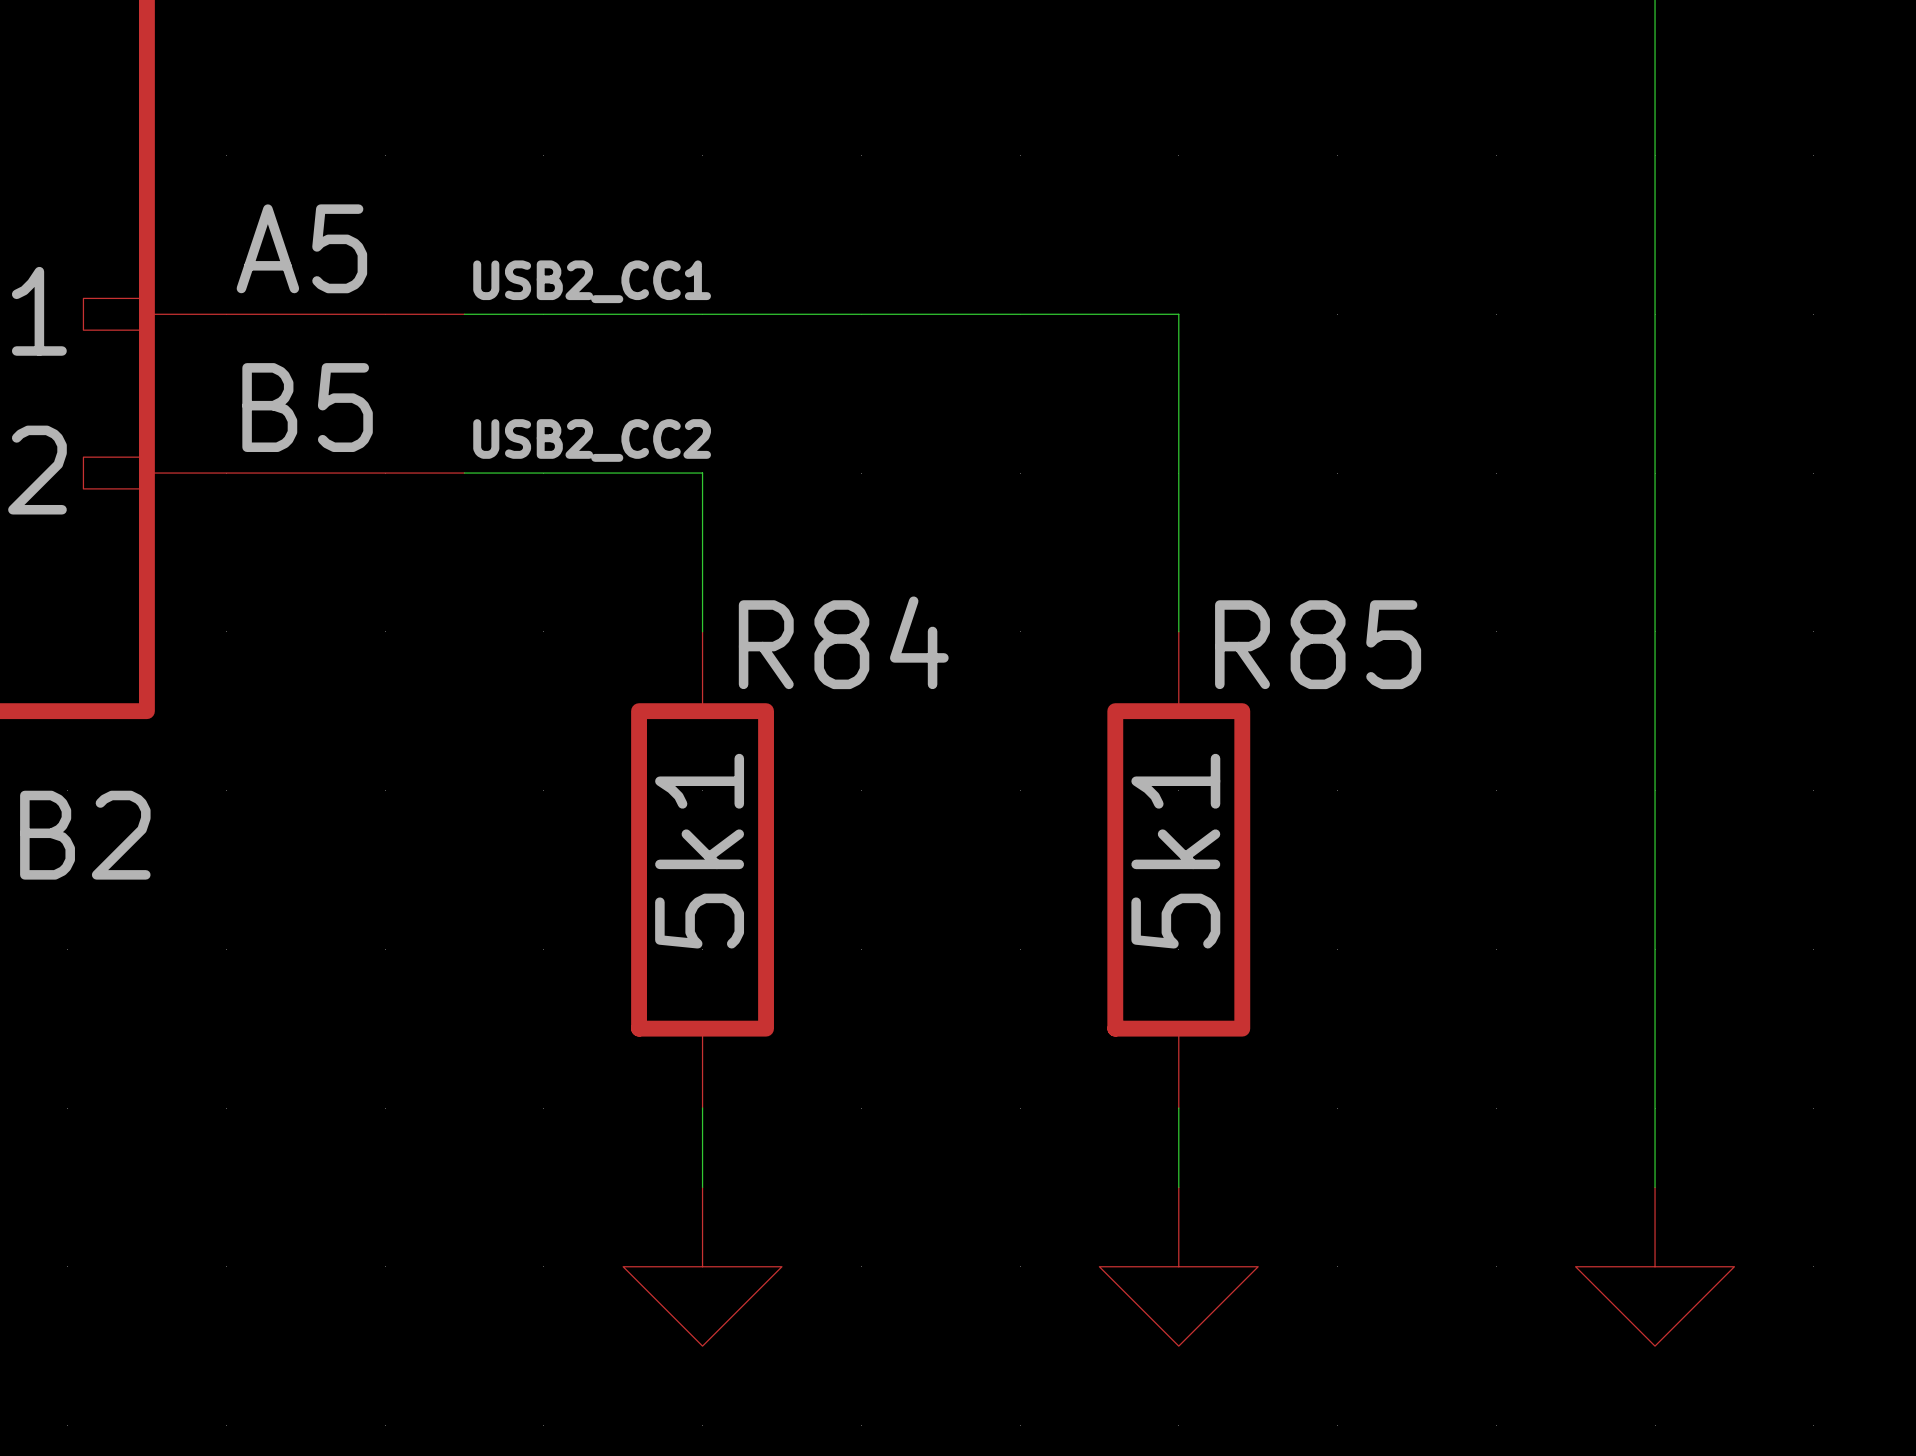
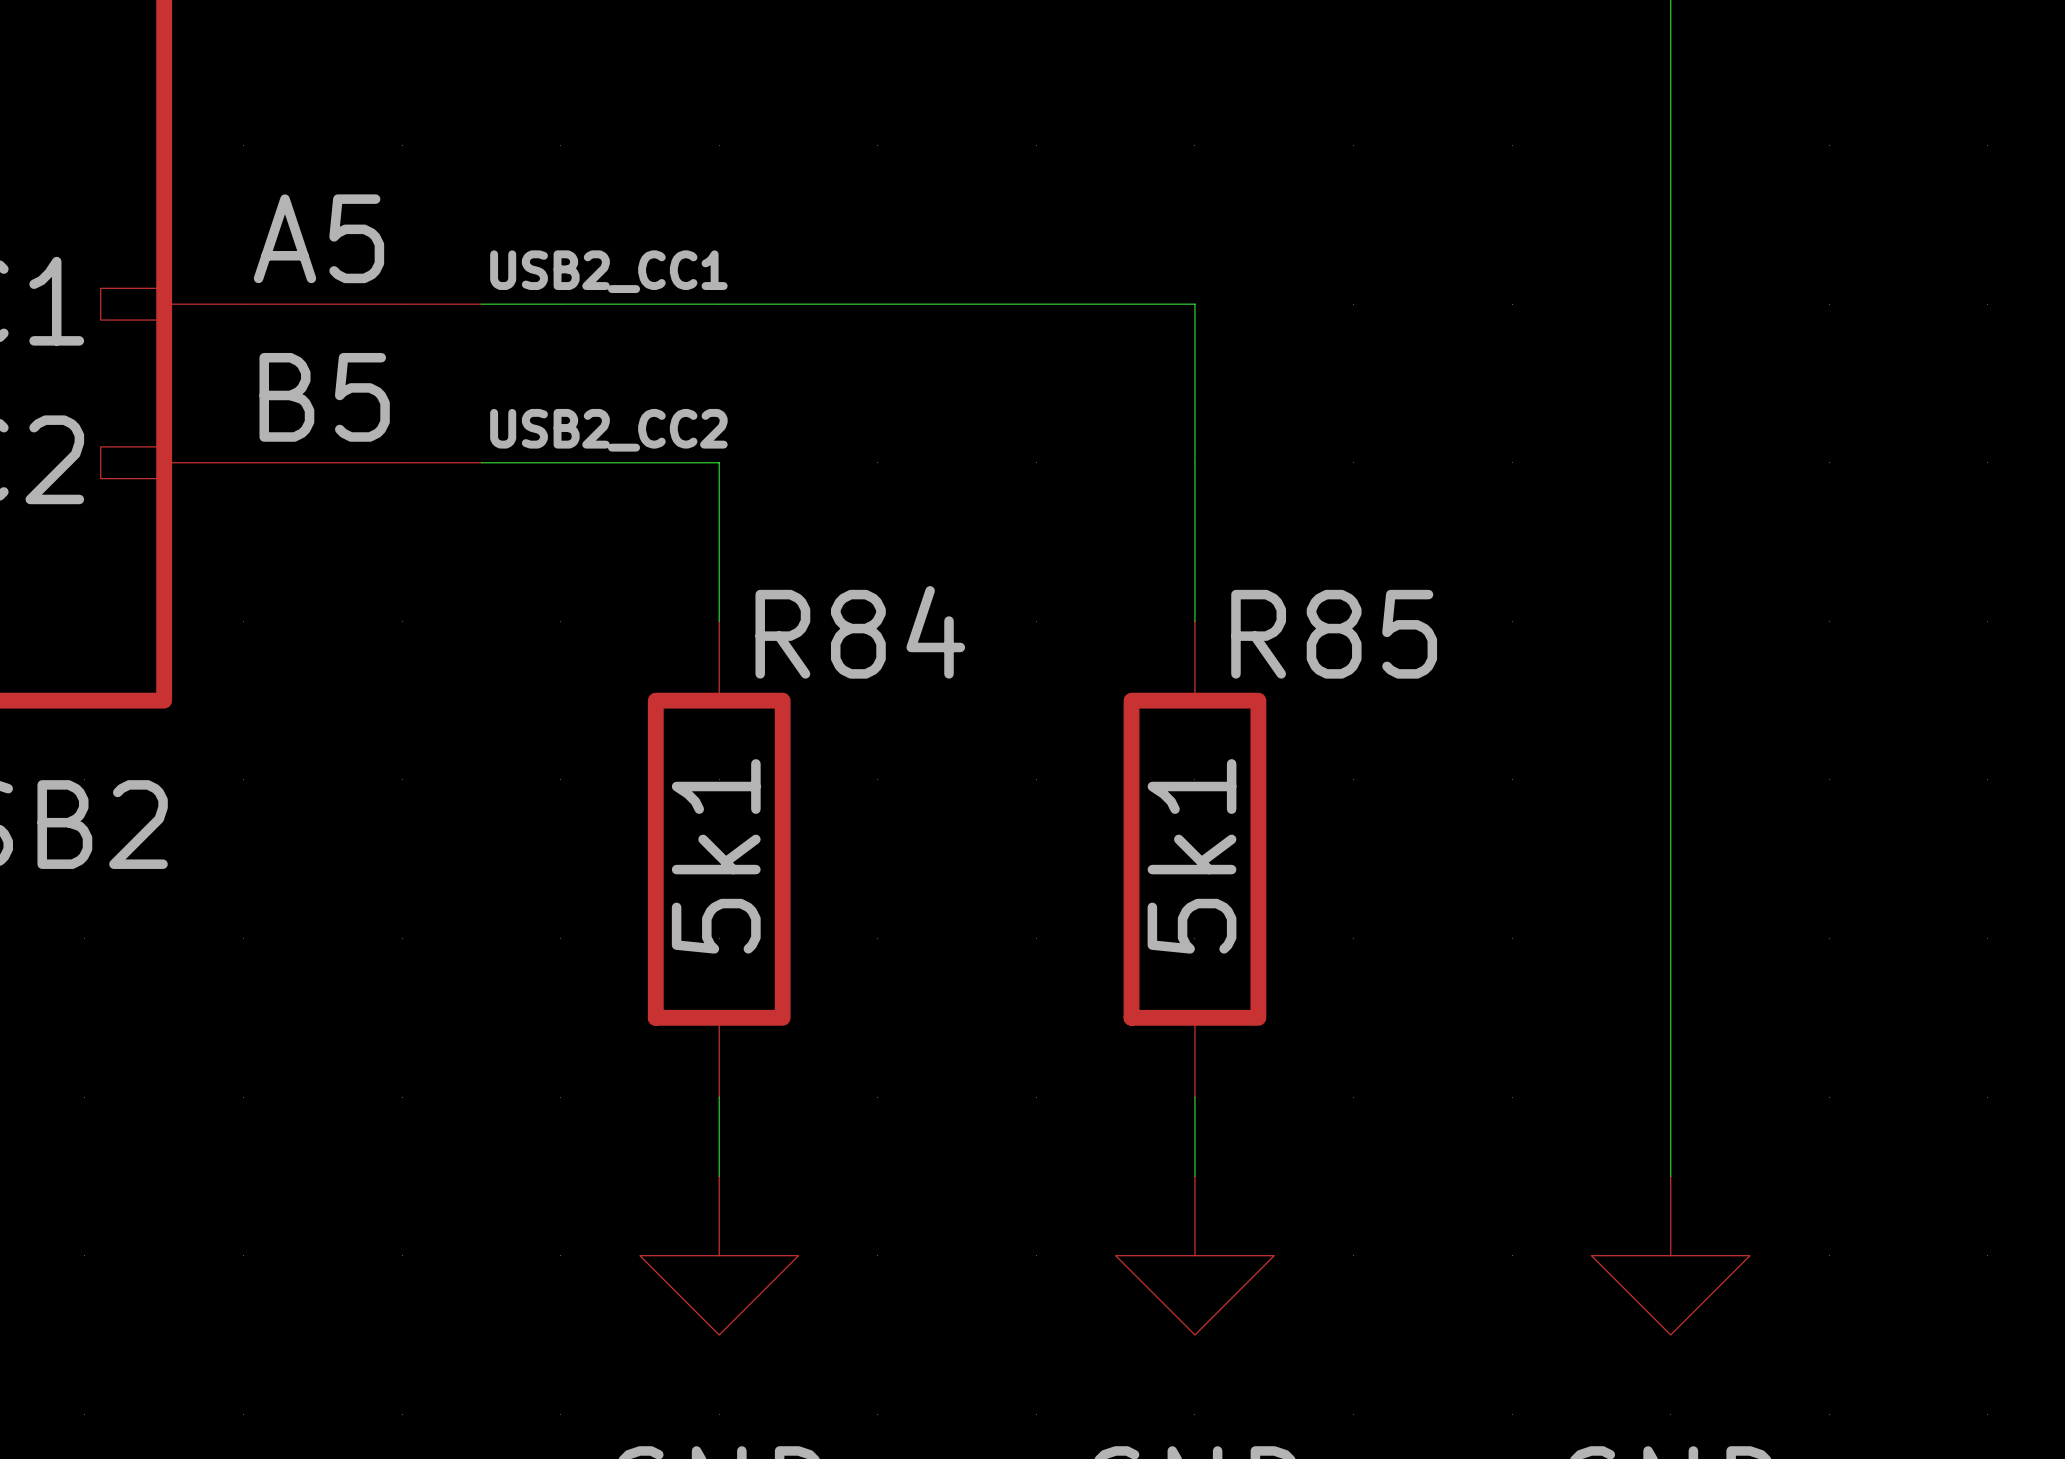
R84 value position: 5k1 (699, 851) -> 5k1 (716, 856)
R85 value position: 5k1 (1175, 851) -> 5k1 (1192, 856)

